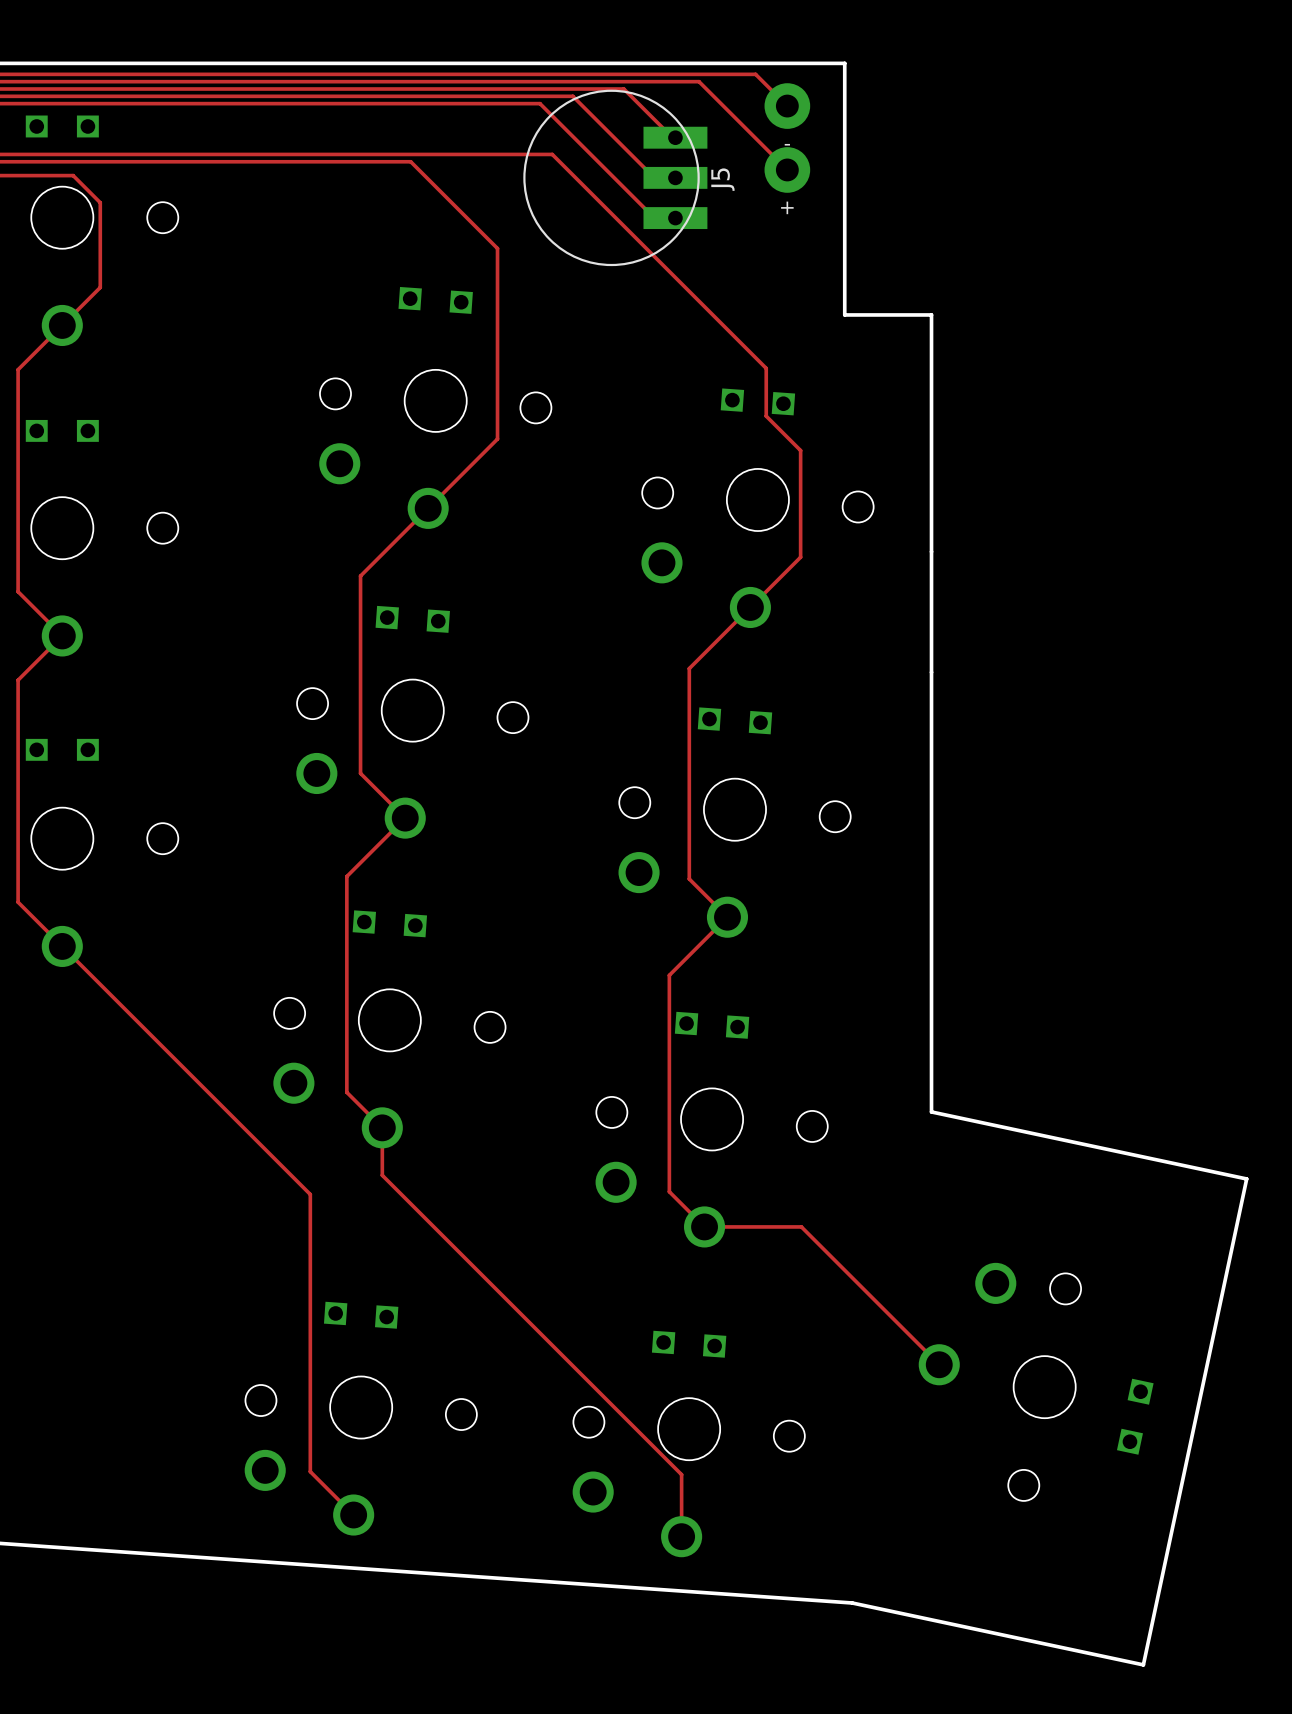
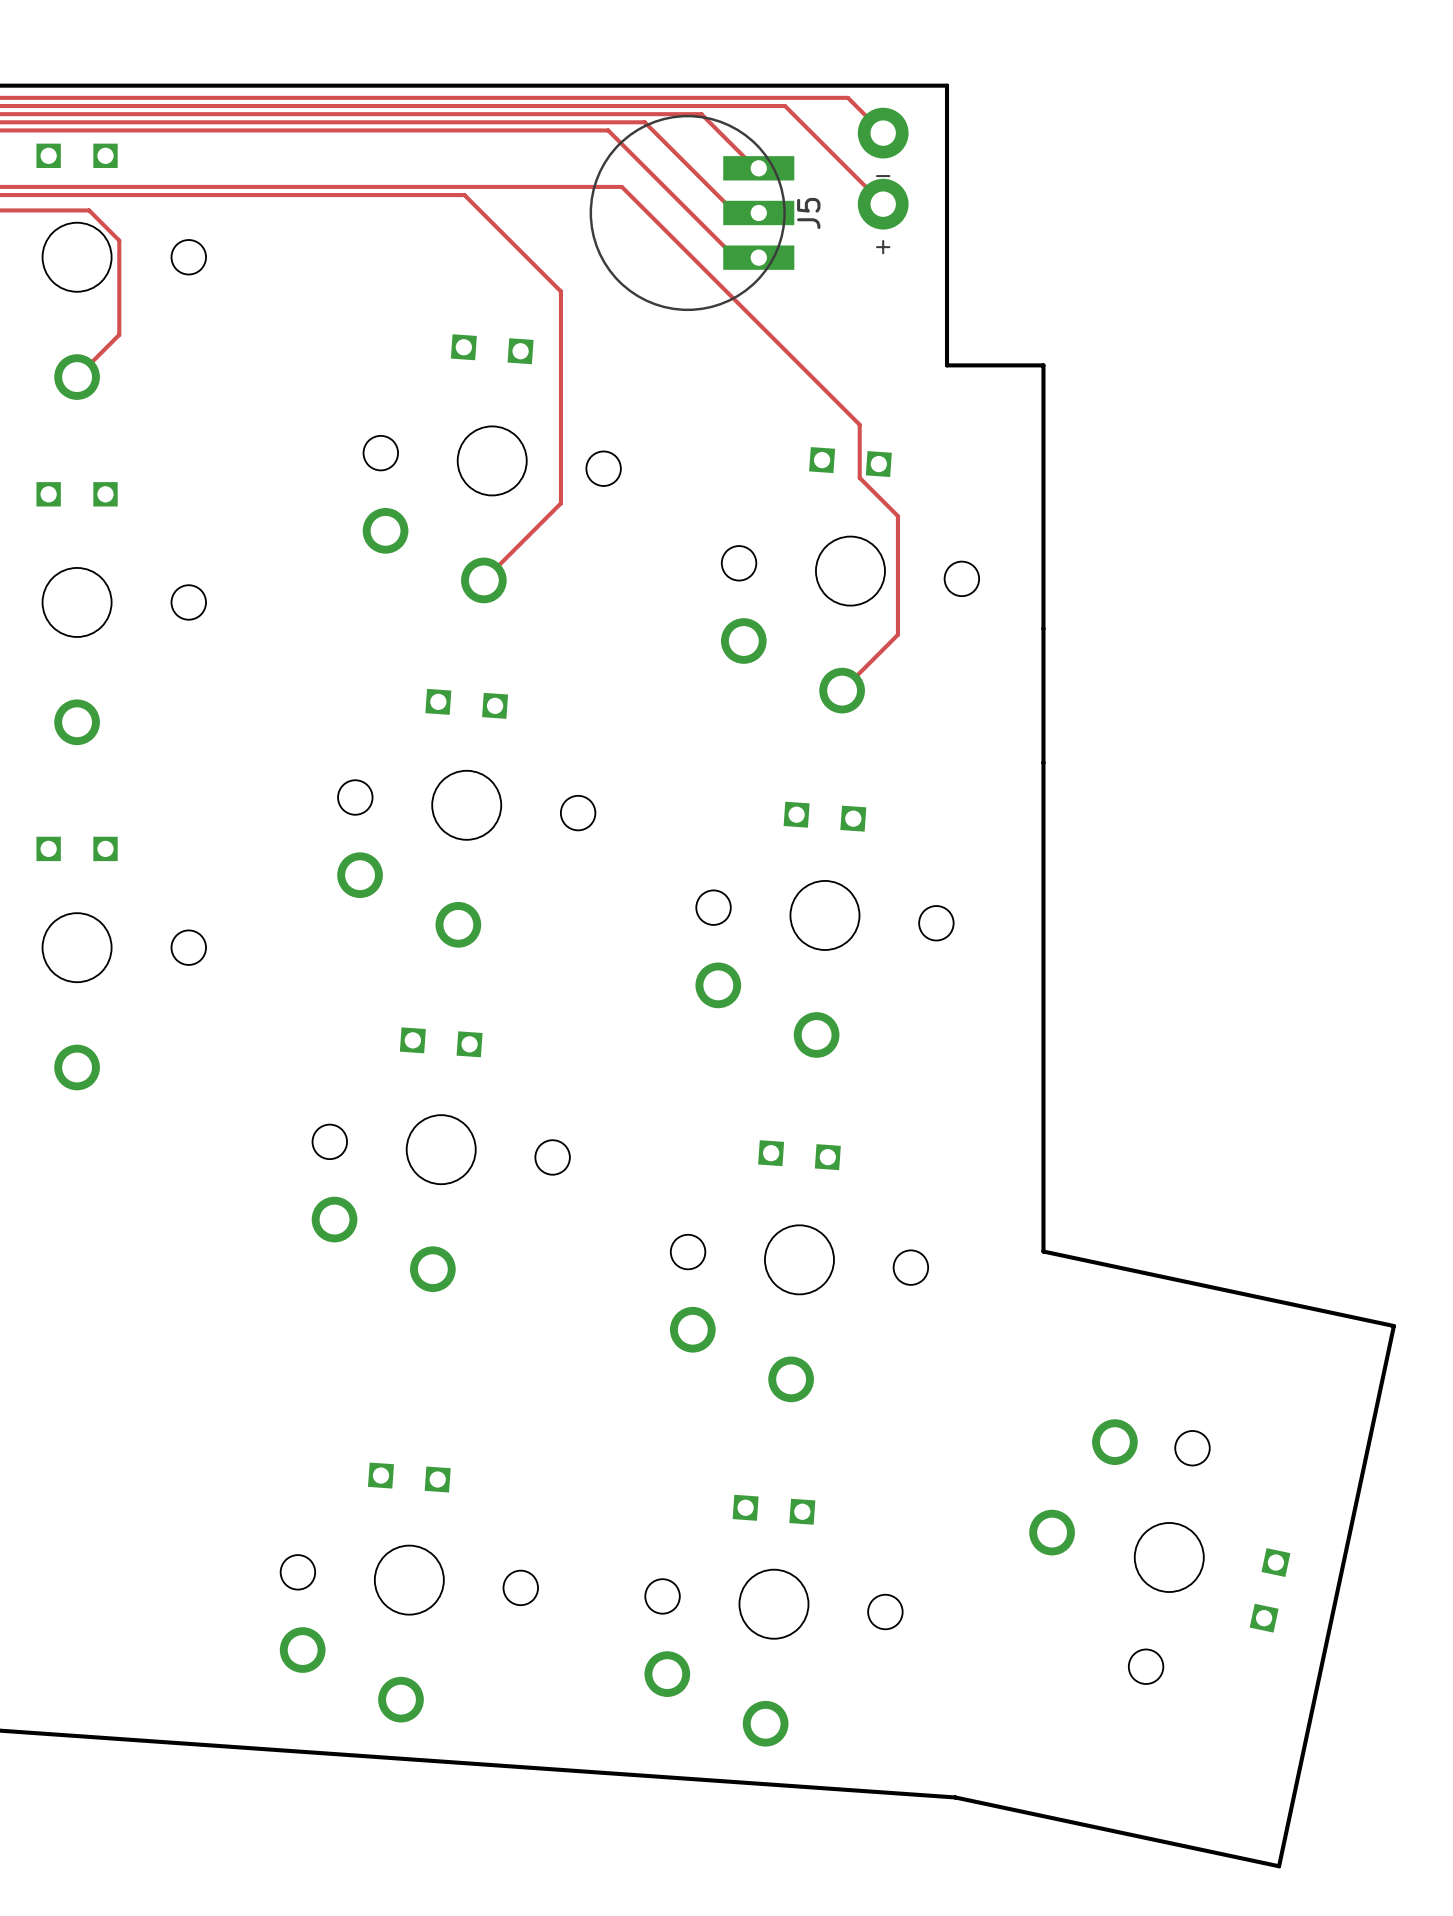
track: (62, 325) (18, 369) (18, 591) (62, 635) (18, 680) (18, 902) (310, 1194) (310, 1471) (353, 1515) -> none
track: (428, 508) (360, 576) (360, 773) (405, 818) (346, 876) (346, 1092) (382, 1127) (382, 1175) (681, 1474) (681, 1536) -> none
track: (750, 607) (689, 668) (689, 879) (727, 917) (669, 975) (669, 1191) (704, 1226) (801, 1226) (939, 1364) -> none

